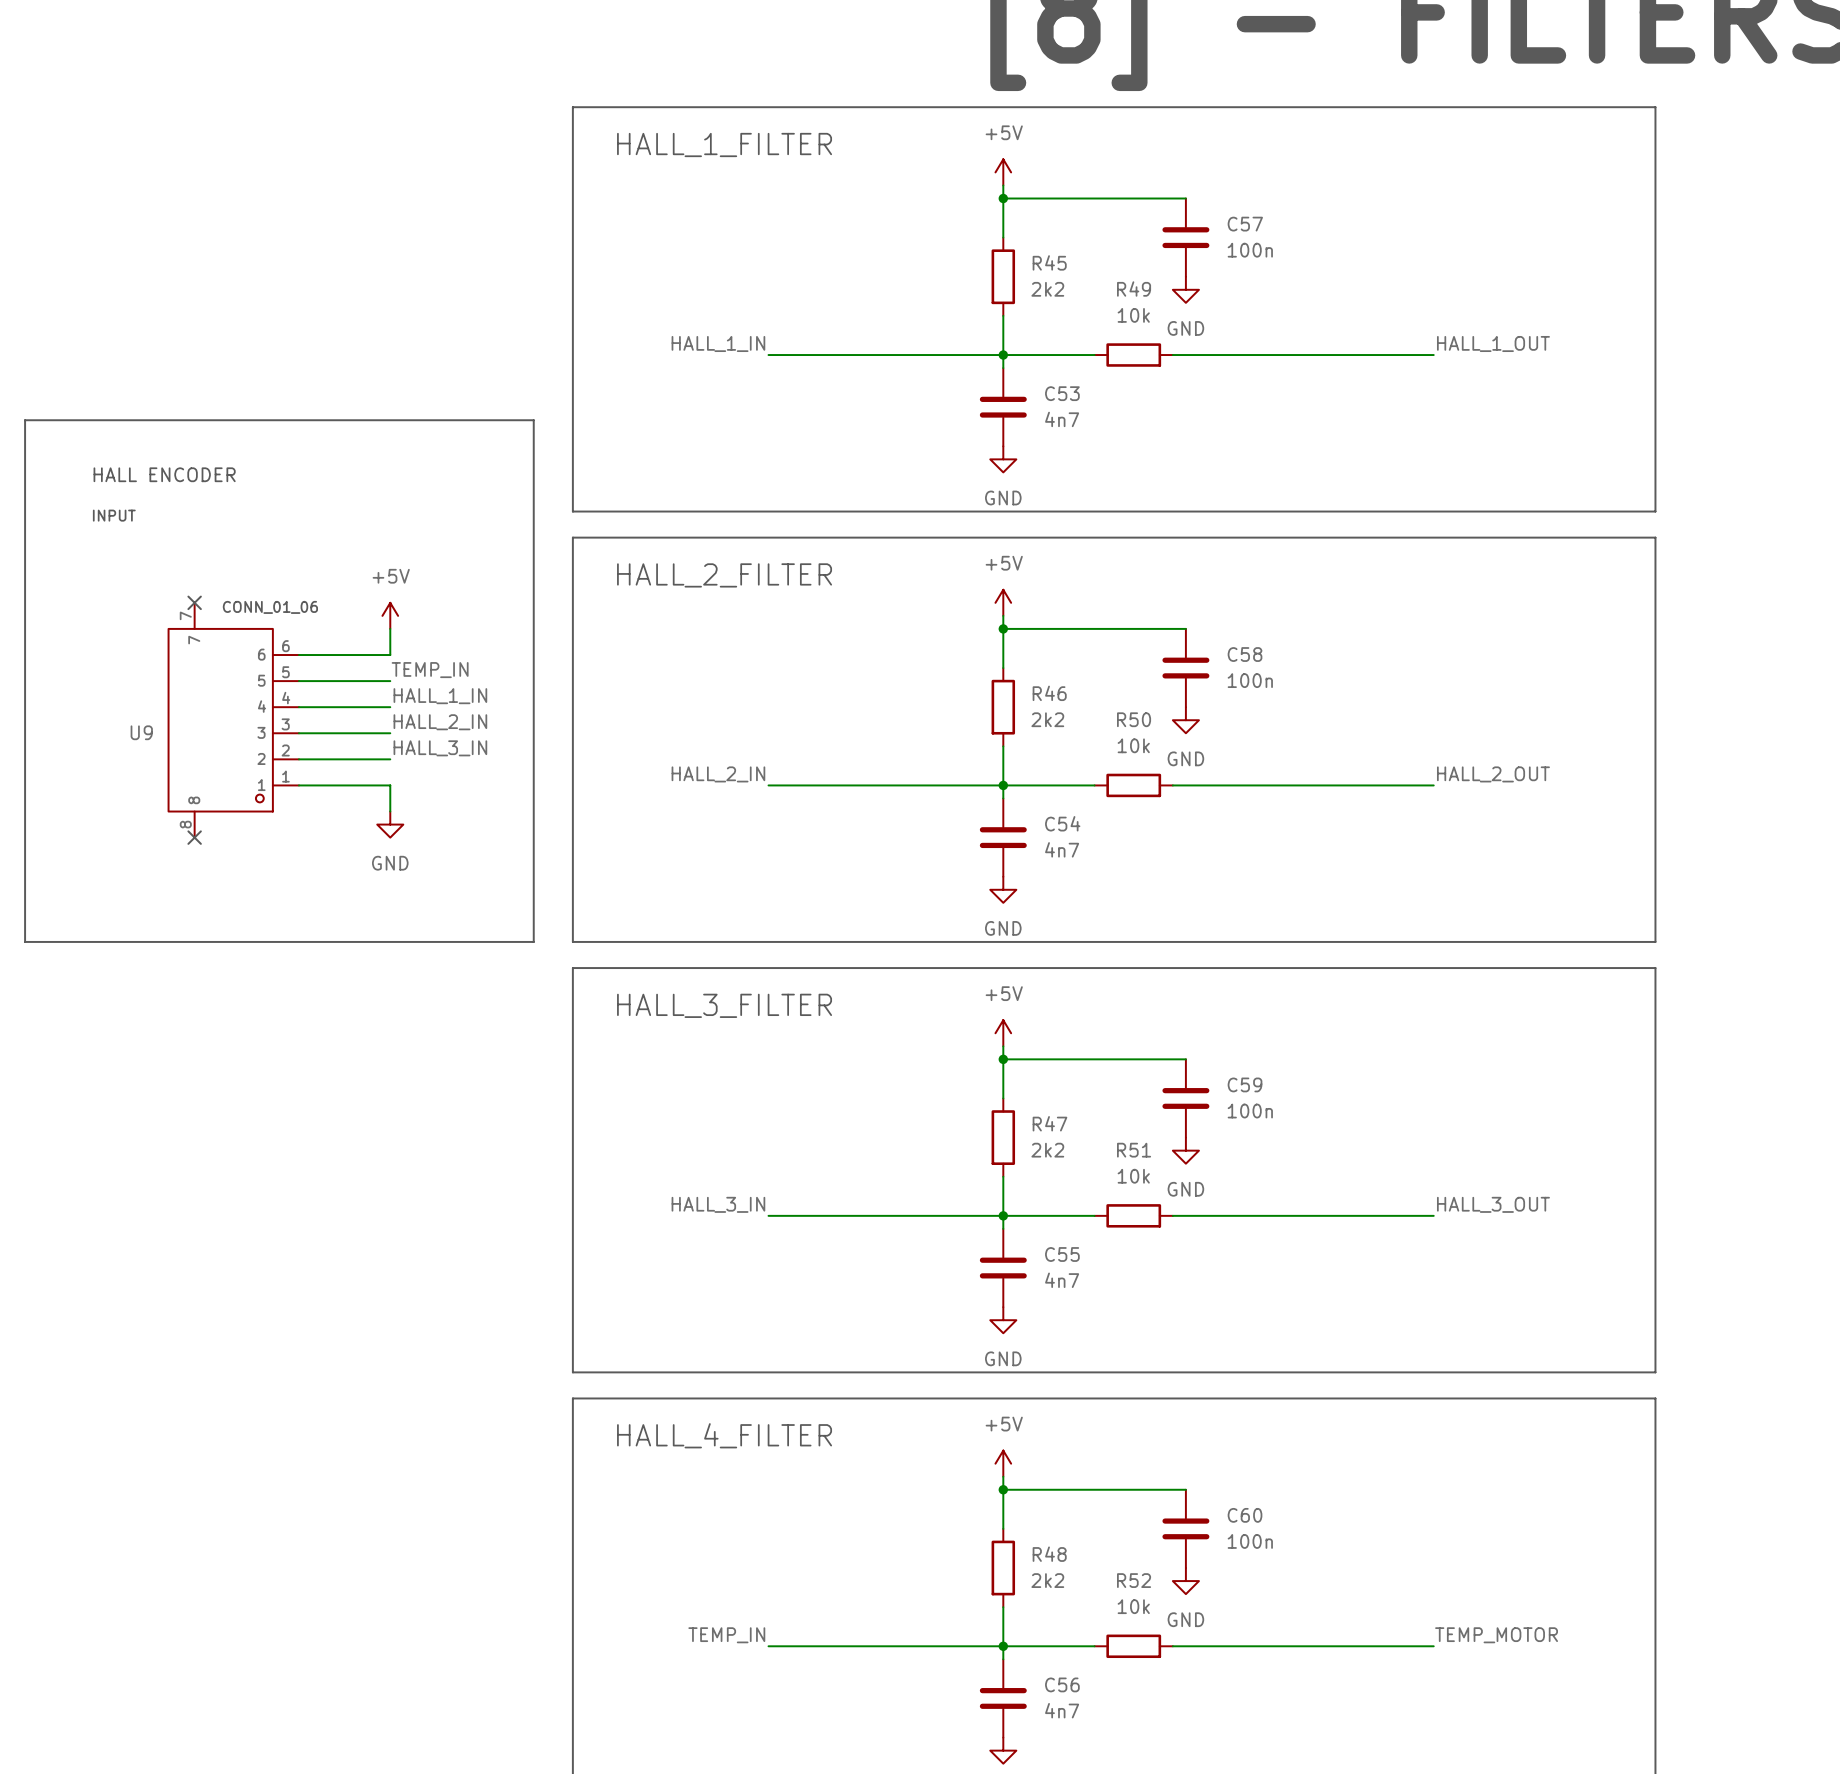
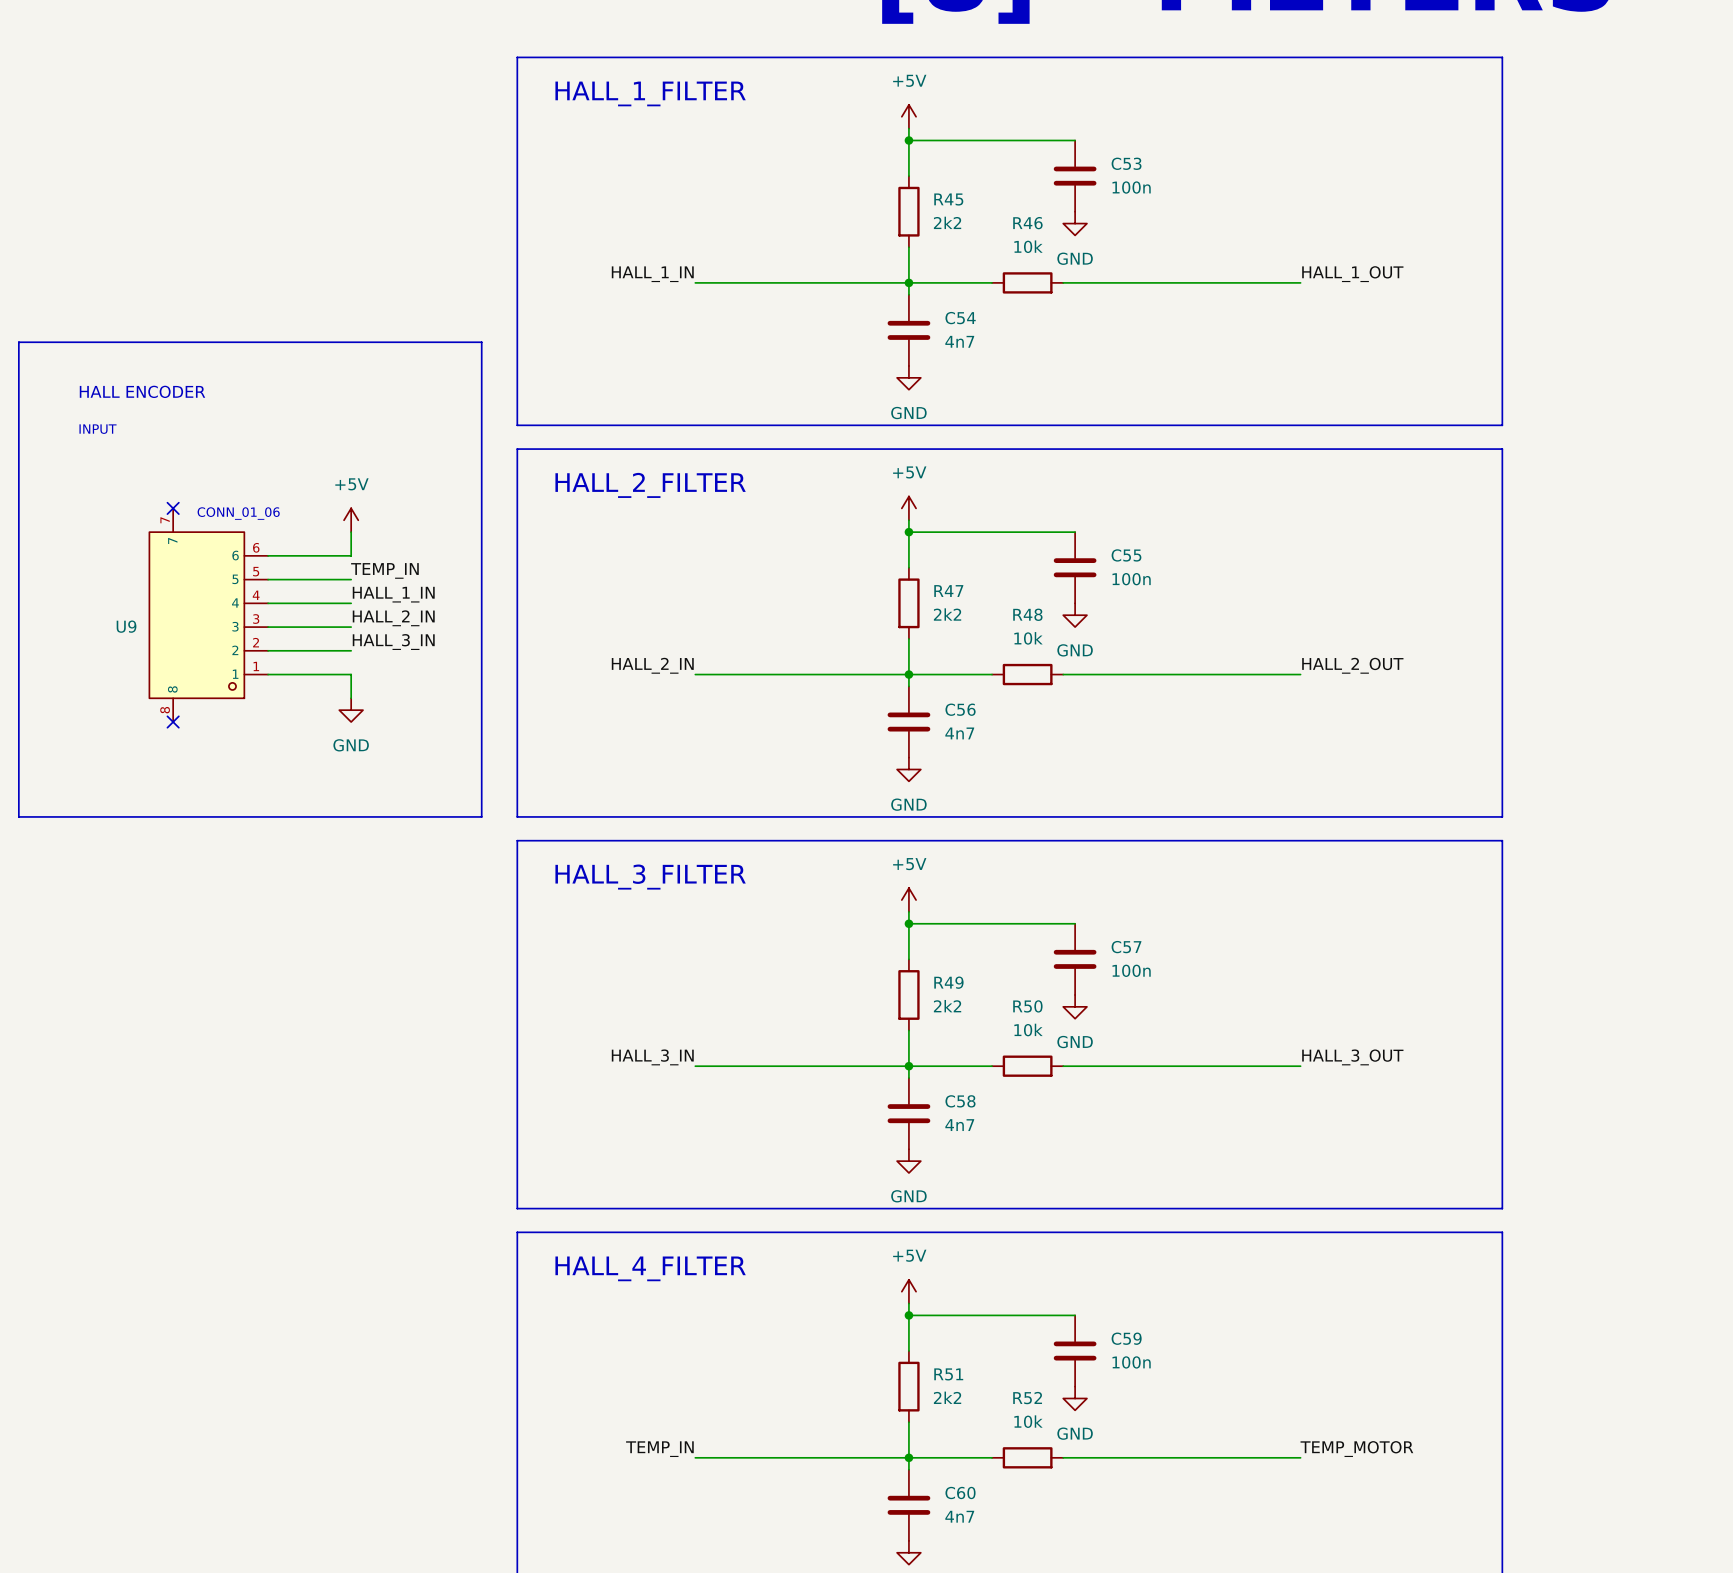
C57 name: C57 (1245, 224) -> C53 (1126, 163)
R49 name: R49 (1134, 289) -> R46 (1027, 223)
C53 name: C53 (1062, 393) -> C54 (960, 318)
C58 name: C58 (1245, 654) -> C55 (1126, 555)
R46 name: R46 (1049, 693) -> R47 (948, 591)
R50 name: R50 (1134, 719) -> R48 (1027, 614)
C54 name: C54 (1062, 823) -> C56 (960, 709)
C59 name: C59 (1245, 1084) -> C57 (1126, 947)
R47 name: R47 (1049, 1123) -> R49 (948, 982)
R51 name: R51 (1134, 1150) -> R50 (1027, 1006)
C55 name: C55 (1062, 1254) -> C58 (960, 1101)
C60 name: C60 (1245, 1515) -> C59 (1126, 1338)
R48 name: R48 (1049, 1554) -> R51 (948, 1374)
C56 name: C56 (1062, 1684) -> C60 (960, 1493)

